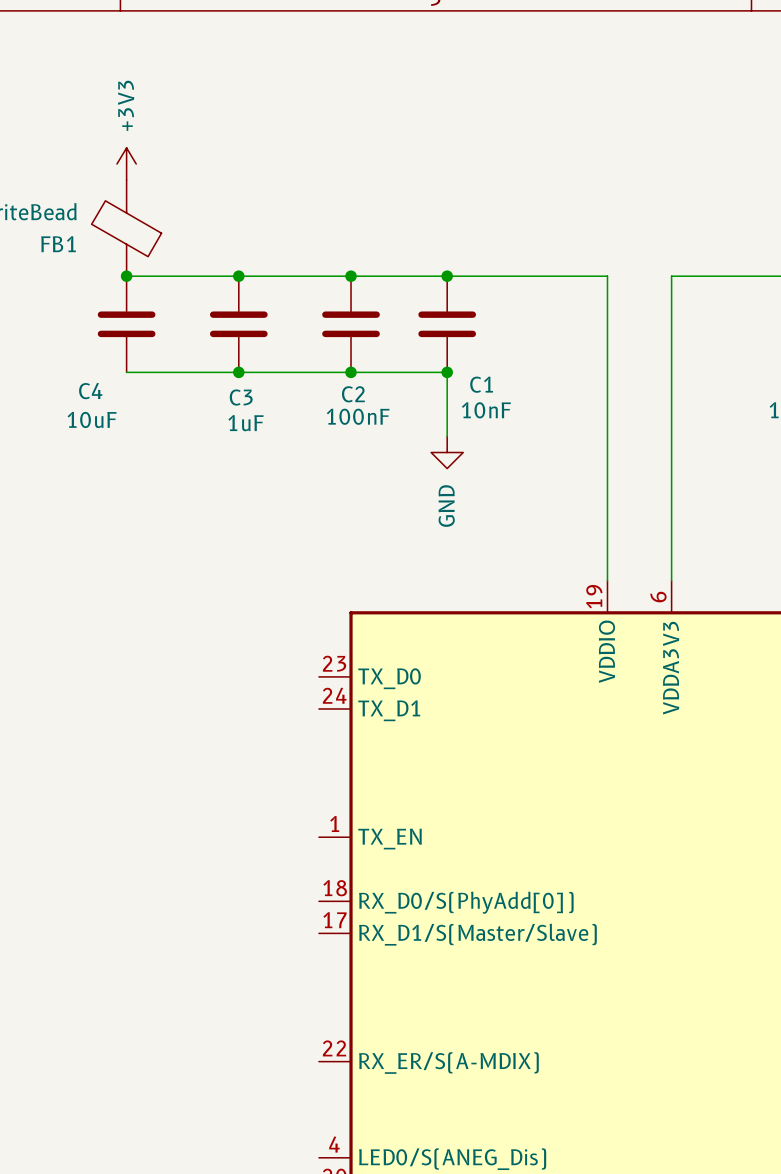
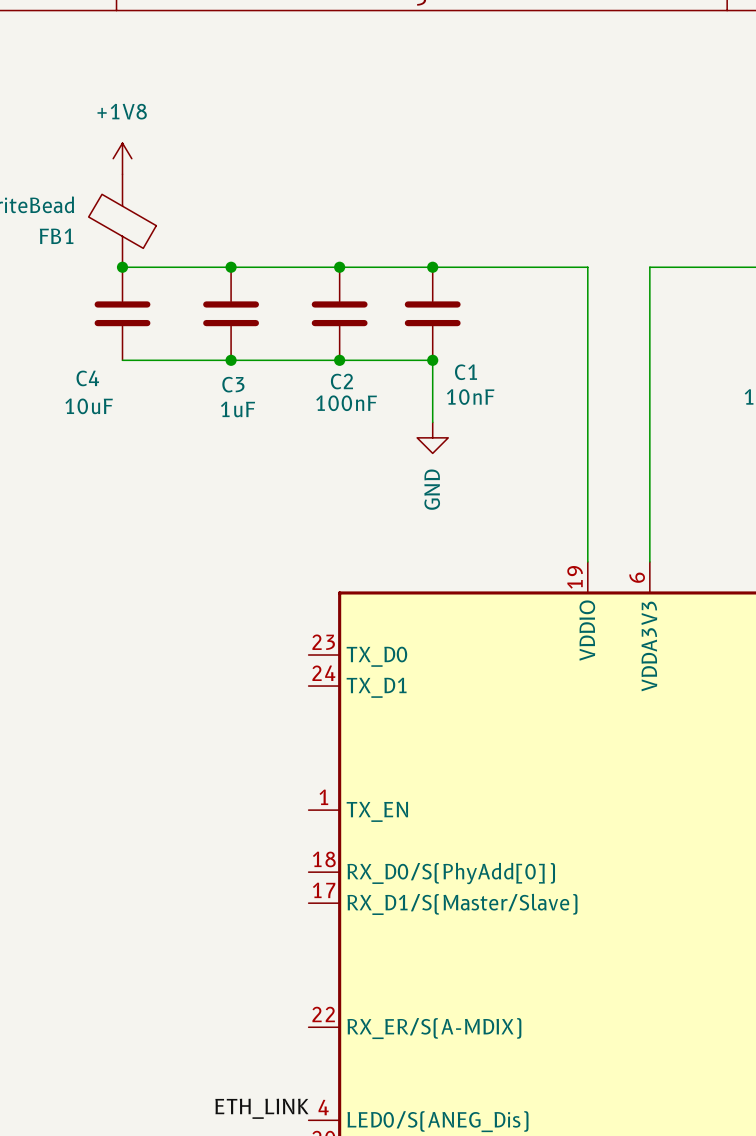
power symbol: +3V3 (126, 163) -> +1V8 (122, 158)
label: none -> ETH_LINK (261, 1108)

